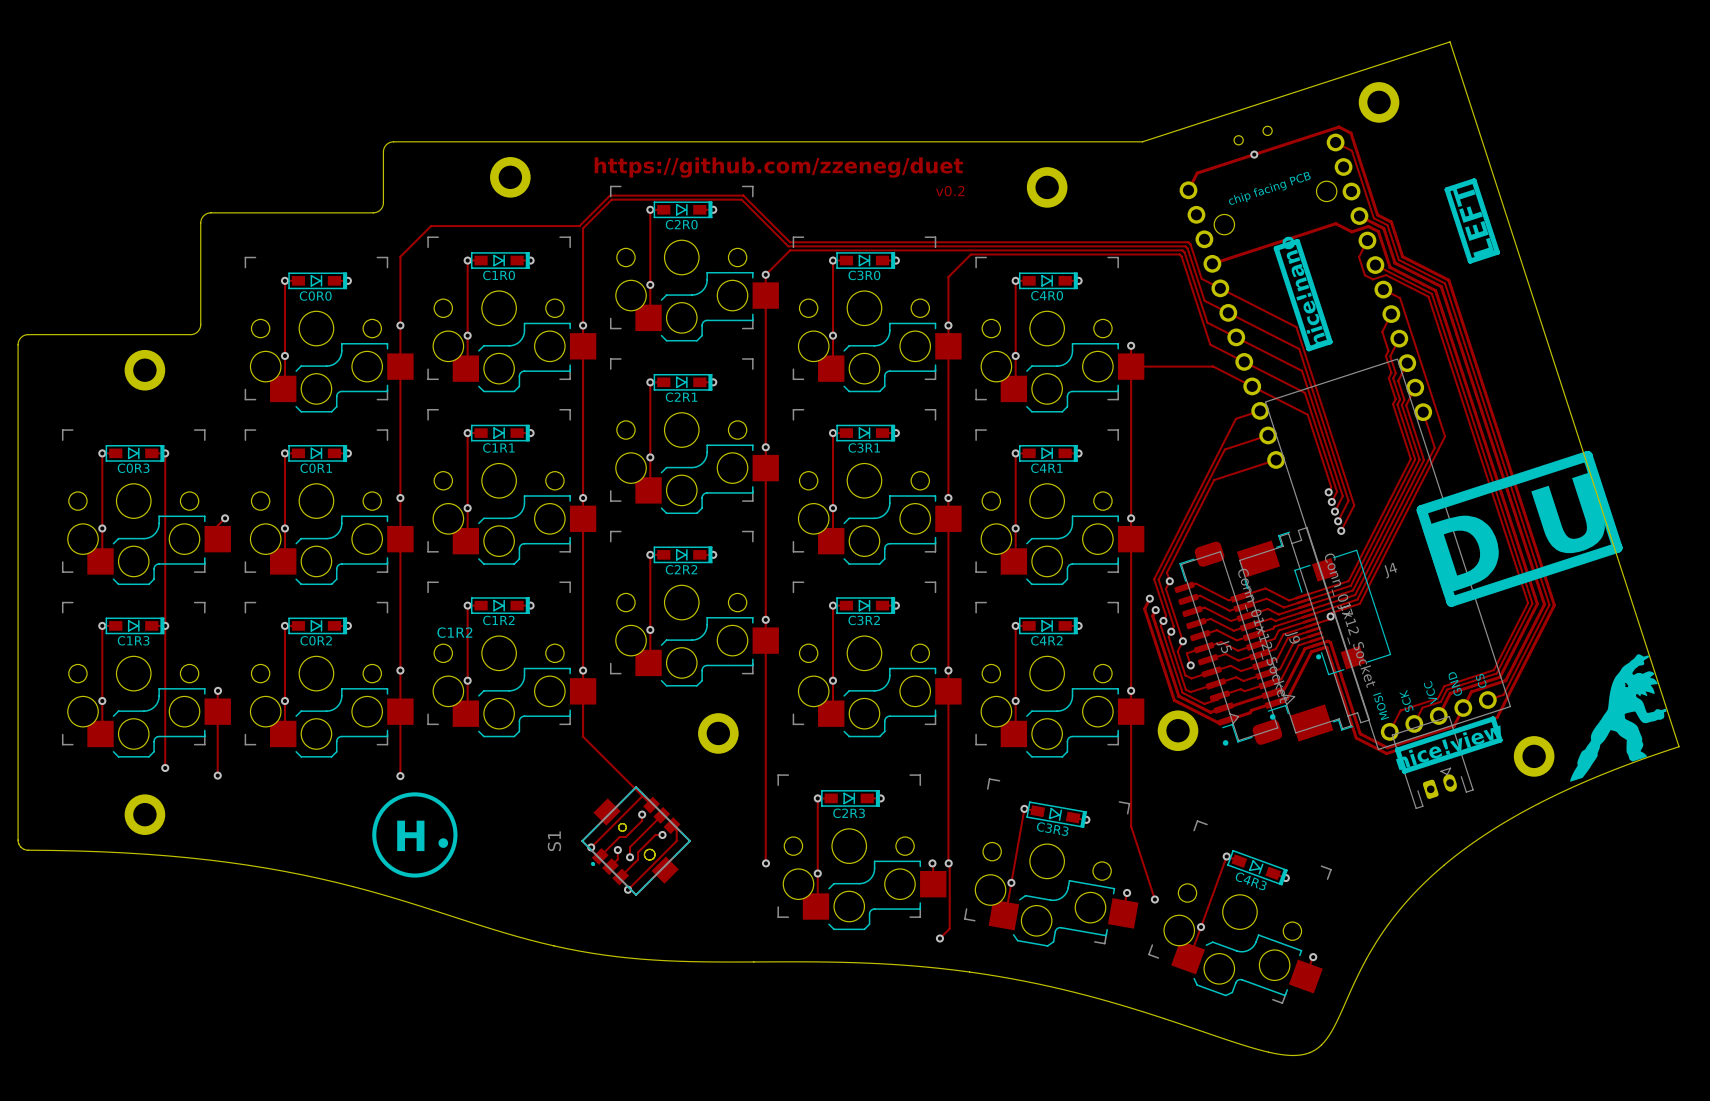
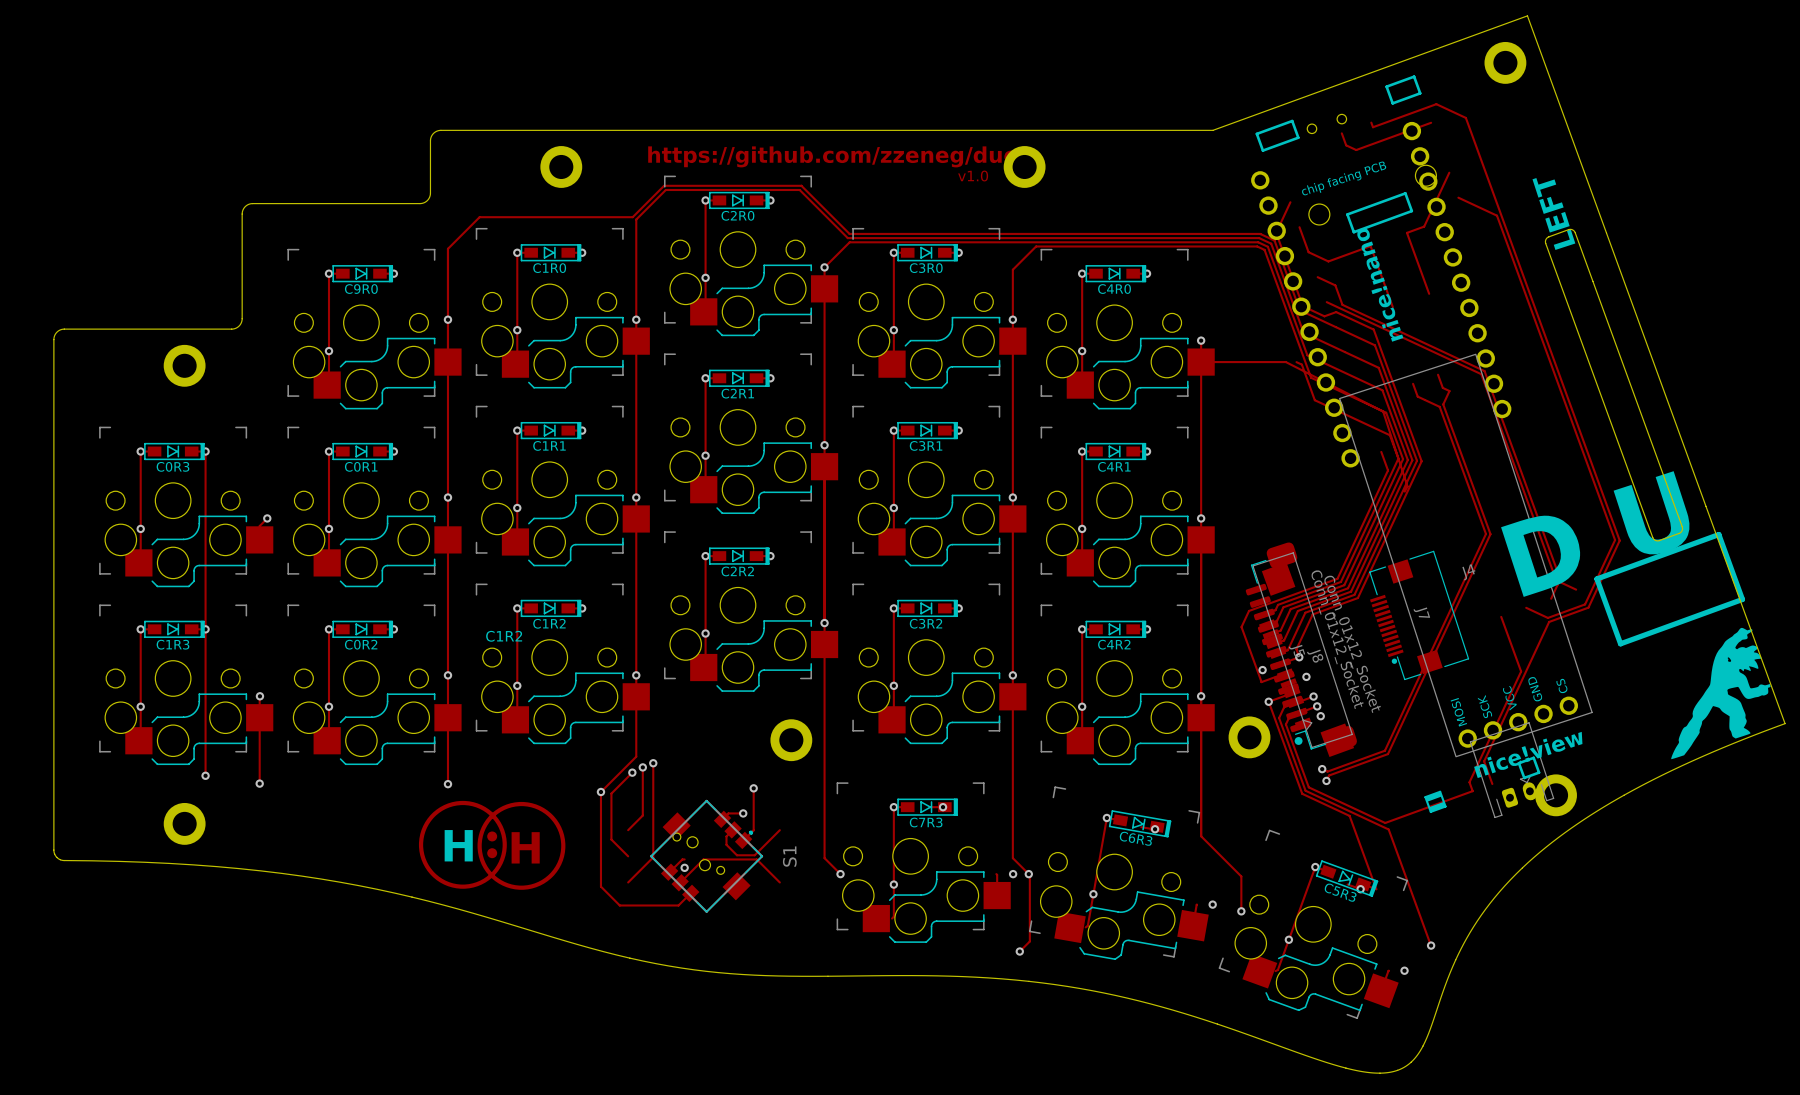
line: none -> (1414, 76) (1386, 86) (1392, 103) (1420, 93) (1414, 76)
part position: (1379, 102) -> (1505, 62)
line: none -> (1292, 121) (1256, 133) (1262, 150) (1298, 137) (1292, 121)
track: none -> (1371, 122) (1372, 127) (1436, 104) (1465, 117) (1619, 540) (1588, 607) (1549, 621) (1484, 761) (1492, 783)
track: none -> (1431, 122) (1356, 150) (1346, 145) (1341, 133)
board edge: (1142, 141) (1450, 41) (1679, 746) (1607, 772) (1546, 799) (1489, 831) (1443, 865) (1411, 895) (1383, 931) (1362, 966) (1332, 1030) (1324, 1041) (1315, 1049) (1296, 1055) (1268, 1052) (1098, 998) (1037, 983) (983, 974) (882, 963) (678, 961) (605, 955) (529, 939) (367, 890) (284, 871) (168, 855) (28, 850) -> (1212, 130) (1527, 15) (1785, 723) (1703, 756) (1633, 790) (1577, 823) (1528, 862) (1494, 897) (1470, 932) (1450, 972) (1424, 1042) (1416, 1056) (1405, 1066) (1383, 1073) (1350, 1069) (1172, 1010) (1115, 995) (1067, 986) (1015, 980) (962, 976) (778, 975) (694, 969) (616, 955) (443, 904) (340, 882) (216, 866) (64, 860)
track: (1335, 142) (1351, 150) (1373, 218) (1387, 225) (1398, 259) (1445, 283) (1549, 604) (1503, 694) (1487, 700) -> none
via: (1254, 154) -> none
line: (1474, 180) (1447, 189) (1470, 261) (1497, 252) (1474, 180) -> none
track: none -> (1449, 172) (1424, 226) (1406, 232) (1429, 293)
text: none -> v1.0 (973, 176)
part position: (1047, 187) -> (1024, 166)
track: (1188, 190) (1197, 173) (1339, 127) (1350, 133) (1377, 215) (1391, 222) (1402, 256) (1448, 280) (1554, 605) (1497, 717) (1386, 753) (1356, 738) (1326, 647) (1311, 651) (1287, 698) (1251, 710) (1250, 712) (1218, 723) (1174, 700) (1144, 608) (1149, 598) -> none
text: v0.2 (950, 191) -> none
round board edge position: (1326, 191) -> (1425, 175)
line: none -> (1405, 193) (1347, 214) (1353, 232) (1411, 211) (1405, 193)
track: none -> (1458, 197) (1497, 215) (1615, 540) (1585, 604) (1547, 617) (1526, 607)
track: none -> (1290, 202) (1276, 232) (1302, 306) (1324, 316) (1336, 312) (1373, 329) (1421, 461) (1357, 598) (1312, 614) (1296, 649) (1299, 657) (1281, 663)
track: (1359, 216) (1383, 228) (1395, 263) (1441, 286) (1544, 604) (1505, 680) (1471, 691) (1453, 726) (1387, 747) (1360, 733) (1330, 642) (1327, 641) (1305, 648) (1284, 688) (1210, 712) (1178, 696) (1152, 615) (1155, 610) -> none
round board edge position: (1224, 224) -> (1319, 214)
track: none -> (1299, 227) (1308, 252) (1328, 261) (1370, 246) (1392, 307)
board edge: none -> (1568, 229) (1548, 237) (1545, 242) (1652, 537) (1658, 540) (1680, 532) (1682, 527) (1575, 232) (1572, 229) (1568, 229)
track: (1367, 240) (1359, 257) (1364, 275) (1372, 279) (1386, 275) (1428, 296) (1528, 603) (1493, 670) (1444, 686) (1438, 698) (1400, 710) (1389, 731) -> none
line: (1297, 241) (1276, 248) (1308, 348) (1330, 341) (1297, 241) -> none
track: (1188, 242) (1201, 278) (1296, 327) (1354, 505) (1341, 530) -> (1260, 233) (1274, 240) (1299, 310) (1375, 345) (1417, 460) (1354, 594) (1305, 612) (1287, 650) (1278, 653)
track: (1185, 246) (1204, 300) (1299, 348) (1348, 500) (1338, 521) -> (1257, 238) (1271, 243) (1303, 332) (1378, 367) (1412, 460) (1351, 591) (1297, 611) (1284, 640) (1274, 644)
track: (1182, 250) (1207, 322) (1302, 370) (1342, 496) (1334, 511) -> (1254, 242) (1267, 246) (1307, 355) (1382, 390) (1407, 460) (1348, 588) (1290, 609) (1280, 630) (1270, 634)
track: (1179, 254) (1210, 344) (1304, 392) (1337, 491) (1331, 501) -> (1251, 246) (1257, 246) (1264, 249) (1311, 377) (1386, 412) (1403, 459) (1344, 585) (1283, 607) (1277, 620) (1267, 624)
track: (1212, 263) (1335, 223) (1351, 231) (1368, 226) (1378, 231) (1390, 267) (1435, 290) (1537, 603) (1500, 677) (1450, 693) (1438, 715) -> none
track: (1375, 265) (1431, 293) (1532, 603) (1496, 673) (1447, 689) (1440, 701) (1422, 707) (1414, 723) -> none
part side: top (317, 280) -> bottom (362, 273)
track: none -> (1317, 277) (1335, 285) (1342, 304) (1484, 371) (1561, 582) (1576, 589)
track: (1383, 289) (1400, 298) (1445, 436) (1359, 603) (1332, 612) (1329, 619) (1283, 634) (1275, 649) (1238, 660) (1225, 654) (1208, 659) -> none
track: none -> (1326, 302) (1481, 374) (1557, 584) (1551, 598)
track: (1391, 314) (1382, 331) (1388, 350) (1385, 356) (1391, 372) (1388, 378) (1395, 399) (1393, 404) (1410, 459) (1348, 581) (1289, 600) (1265, 588) (1228, 600) (1196, 583) (1184, 587) -> none
track: (1399, 338) (1390, 356) (1395, 373) (1393, 378) (1400, 399) (1397, 404) (1415, 459) (1350, 585) (1283, 607) (1266, 598) (1229, 610) (1200, 595) (1188, 599) -> none
track: (1407, 363) (1398, 380) (1404, 399) (1401, 405) (1419, 459) (1353, 590) (1278, 614) (1267, 608) (1230, 621) (1204, 607) (1192, 611) -> none
track: none -> (1296, 362) (1301, 364) (1314, 400) (1389, 435) (1398, 458) (1340, 581) (1278, 604) (1275, 610) (1263, 614)
track: none -> (1438, 374) (1442, 387) (1449, 391) (1443, 404) (1490, 534) (1387, 754) (1328, 775) (1326, 780)
track: none -> (1413, 383) (1417, 396) (1439, 406) (1485, 534) (1384, 750) (1327, 771) (1322, 769)
track: (1415, 387) (1406, 405) (1423, 460) (1355, 595) (1275, 620) (1271, 618) (1233, 630) (1210, 618) (1196, 623) -> none
track: (1260, 410) (1235, 418) (1154, 579) (1166, 615) (1160, 626) (1182, 692) (1204, 703) (1218, 699) (1219, 695) (1240, 689) (1244, 691) (1281, 679) (1298, 645) (1316, 639) -> none
track: (1423, 412) (1434, 447) (1357, 599) (1236, 640) (1216, 630) (1200, 635) -> none
track: (1268, 435) (1224, 449) (1158, 579) (1173, 626) (1168, 636) (1185, 689) (1190, 692) (1236, 677) (1243, 680) (1280, 669) (1294, 641) (1315, 634) -> none
track: none -> (1381, 451) (1388, 470) (1337, 578) (1249, 610) (1241, 627) (1261, 682) (1285, 673)
line: (1587, 456) (1421, 510) (1451, 601) (1617, 547) (1587, 456) -> none
track: (1276, 459) (1214, 480) (1166, 572) (1169, 581) (1165, 588) (1182, 641) (1177, 651) (1185, 675) (1191, 678) (1230, 665) (1241, 671) (1277, 659) (1287, 638) (1313, 629) -> none
via: (1328, 492) -> none
via: (1331, 501) -> none
via: (1334, 511) -> none
via: (1338, 521) -> none
via: (1341, 530) -> none
line: none -> (1718, 534) (1596, 578) (1620, 643) (1742, 599) (1718, 534)
via: (1169, 581) -> none
via: (1149, 598) -> none
via: (1155, 610) -> none
track: none -> (1501, 616) (1521, 671) (1469, 782) (1472, 791) (1385, 822) (1308, 787) (1285, 724) (1289, 716) (1317, 706)
via: (1330, 616) -> none
via: (1163, 620) -> none
track: (1310, 620) (1278, 630) (1274, 638) (1238, 650) (1221, 642) (1187, 653) (1190, 665) -> none
via: (1171, 631) -> none
J9: Conn_01x12_Socket (1300, 634) -> none
track: (765, 640) (766, 863) -> (824, 644) (824, 858) (840, 874)
via: (1182, 641) -> none
via: none -> (1299, 657)
J8: none -> Conn_01x12_Socket (1304, 659)
via: none -> (1306, 676)
track: none -> (1292, 693) (1268, 701) (1302, 793) (1349, 815) (1376, 889) (1363, 884)
track: (583, 691) (583, 736) (651, 805) -> (636, 696) (636, 756) (600, 792) (600, 886) (619, 905) (678, 905) (690, 893)
track: none -> (1313, 696) (1284, 707) (1279, 718) (1305, 790) (1388, 829) (1430, 945)
via: none -> (1313, 696)
via: none -> (1268, 701)
via: none -> (1317, 706)
via: none -> (1320, 716)
drawing: [1269, 714, 1276, 720] -> none
drawing position: (1618, 717) -> (1720, 693)
line: (1493, 718) (1397, 749) (1404, 771) (1500, 740) (1493, 718) -> none
part position: (718, 733) -> (791, 740)
drawing: [1222, 740, 1229, 746] -> none
line: none -> (1533, 757) (1518, 763) (1524, 777) (1539, 772) (1533, 757)
track: none -> (653, 763) (653, 857) (628, 882)
via: none -> (653, 763)
part position: (1534, 756) -> (1556, 795)
track: none -> (642, 767) (642, 815) (628, 830)
via: none -> (642, 767)
via: none -> (1322, 769)
track: none -> (632, 772) (611, 793) (611, 839) (628, 856)
via: none -> (632, 772)
via: none -> (1326, 780)
track: none -> (753, 788) (753, 830) (743, 840)
via: none -> (753, 788)
via: none -> (600, 792)
line: none -> (1440, 791) (1425, 797) (1430, 811) (1445, 806) (1440, 791)
drawing: none -> [1425, 792, 1445, 812]
drawing shape: [372, 792, 458, 878] -> [418, 800, 507, 889]
drawing: none -> [477, 801, 566, 890]
track: (642, 796) (591, 847) -> none
via position: (817, 798) -> (893, 807)
track: (831, 798) (817, 798) (817, 904) (816, 906) -> (907, 807) (893, 807) (893, 916) (892, 918)
part: (850, 798) -> none
part: none -> (927, 807)
track: none -> (743, 813) (728, 813) (722, 819)
via: none -> (743, 813)
via position: (1024, 808) -> (1106, 817)
track: (1037, 811) (1024, 808) (1005, 913) (1003, 915) -> (1120, 820) (1106, 817) (1087, 925) (1085, 927)
track: (642, 814) (642, 820) (625, 836) (619, 836) (600, 856) -> none
via: (642, 814) -> none
part: (1056, 814) -> none
part: none -> (1140, 823)
track: (661, 815) (630, 847) (630, 857) -> none
track: none -> (733, 829) (726, 836) (726, 844) (736, 855) (754, 855) (779, 830)
track: (672, 825) (676, 830) (676, 841) (628, 889) -> none
track: (1131, 826) (1154, 899) -> (1201, 836) (1241, 876) (1241, 911)
track: (662, 834) (655, 834) (638, 852) (638, 859) (620, 876) -> none
via: (662, 834) -> none
text: none -> H (525, 847)
drawing shape: [438, 838, 449, 848] -> [487, 848, 498, 859]
S1 rotation: 0° (636, 841) -> 180° (706, 856)
via: (591, 847) -> none
track: (948, 847) (949, 928) (939, 938) -> (1012, 858) (1029, 875) (1029, 941) (1019, 951)
track: none -> (684, 859) (669, 872)
track: (617, 850) (617, 859) (610, 866) -> none
via: (617, 850) -> none
via position: (1226, 856) -> (1315, 867)
track: (1239, 861) (1226, 856) (1190, 956) (1188, 957) -> (1328, 871) (1315, 867) (1277, 970) (1275, 971)
via position: (766, 863) -> (840, 874)
via: (932, 863) -> none
via: none -> (1028, 874)
part: (1257, 867) -> none
part: none -> (1347, 878)
track: none -> (779, 882) (756, 859) (703, 859) (680, 882)
via position: (817, 873) -> (893, 884)
via position: (1011, 882) -> (1093, 894)
via: (628, 889) -> none
via: (1127, 892) -> none
via: none -> (1212, 904)
via: (1154, 899) -> none
via: none -> (1241, 911)
via position: (1201, 927) -> (1288, 939)
via: none -> (1431, 945)
via position: (939, 938) -> (1019, 951)
via position: (1313, 957) -> (1404, 970)

